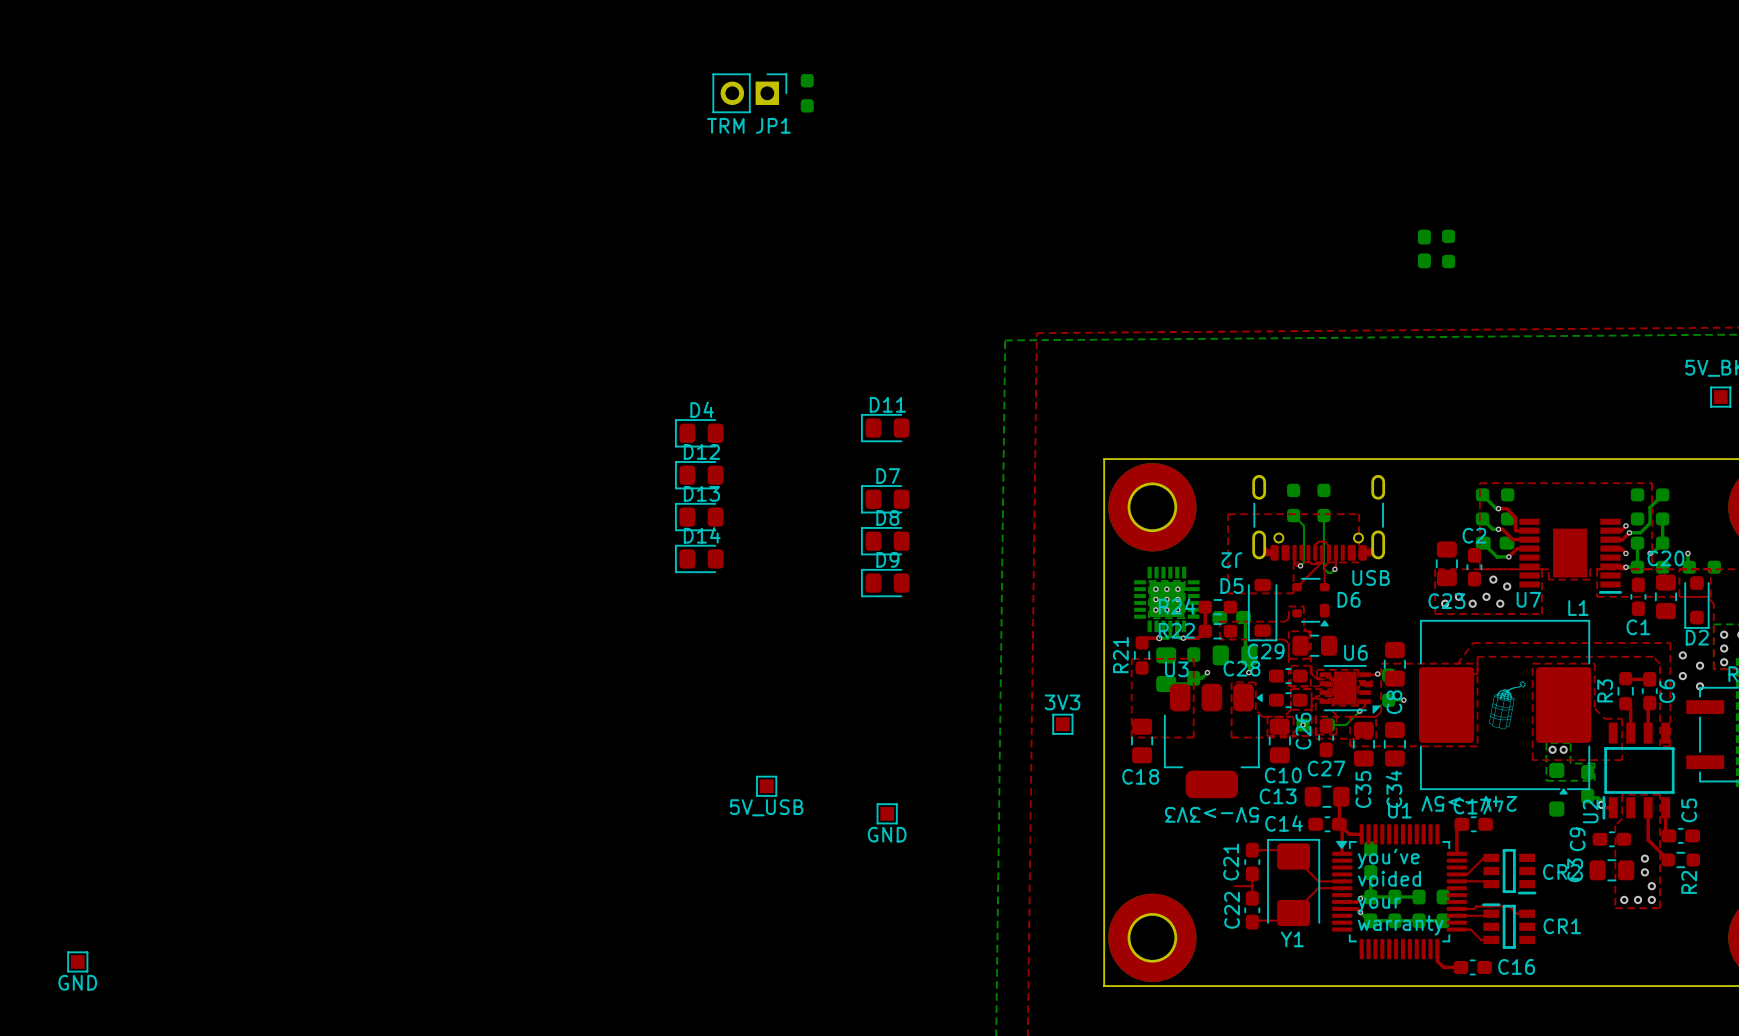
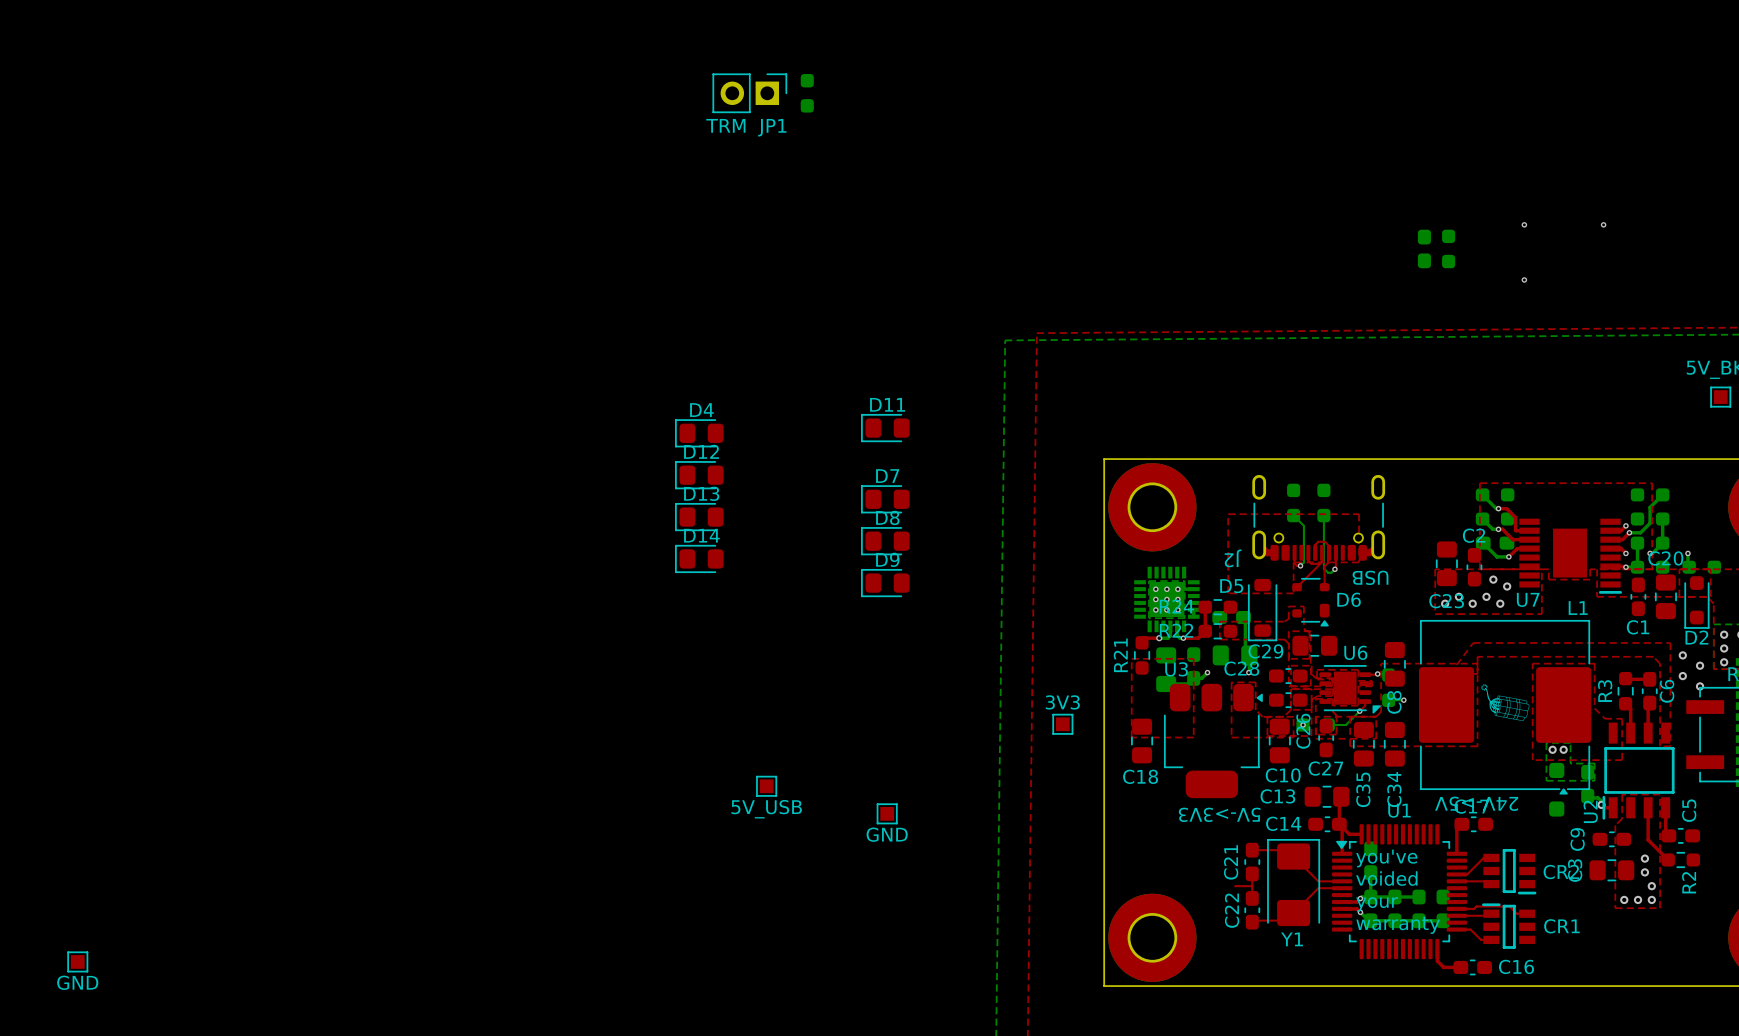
via: none -> (1524, 224)
via: none -> (1603, 224)
via: none -> (1524, 279)
text rotation: 0° (1371, 577) -> 180° (1370, 577)
drawing shape: [1489, 680, 1526, 730] -> [1480, 684, 1530, 721]

